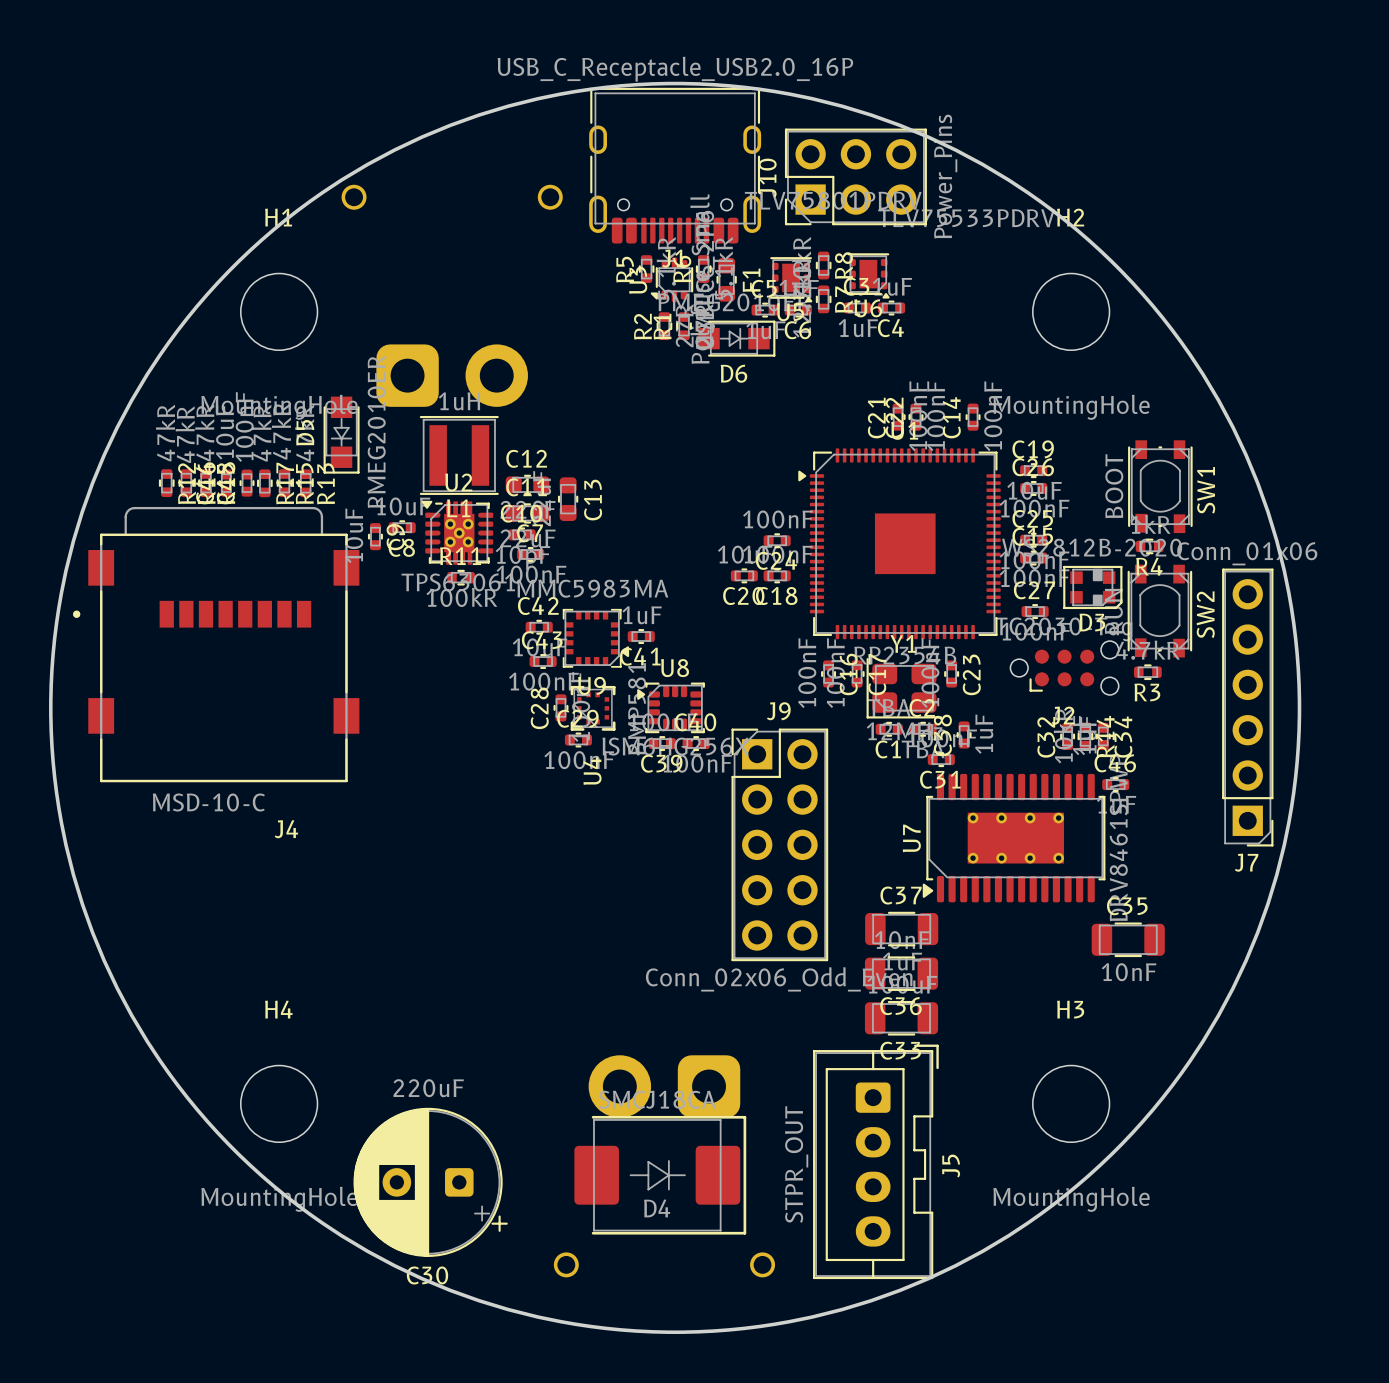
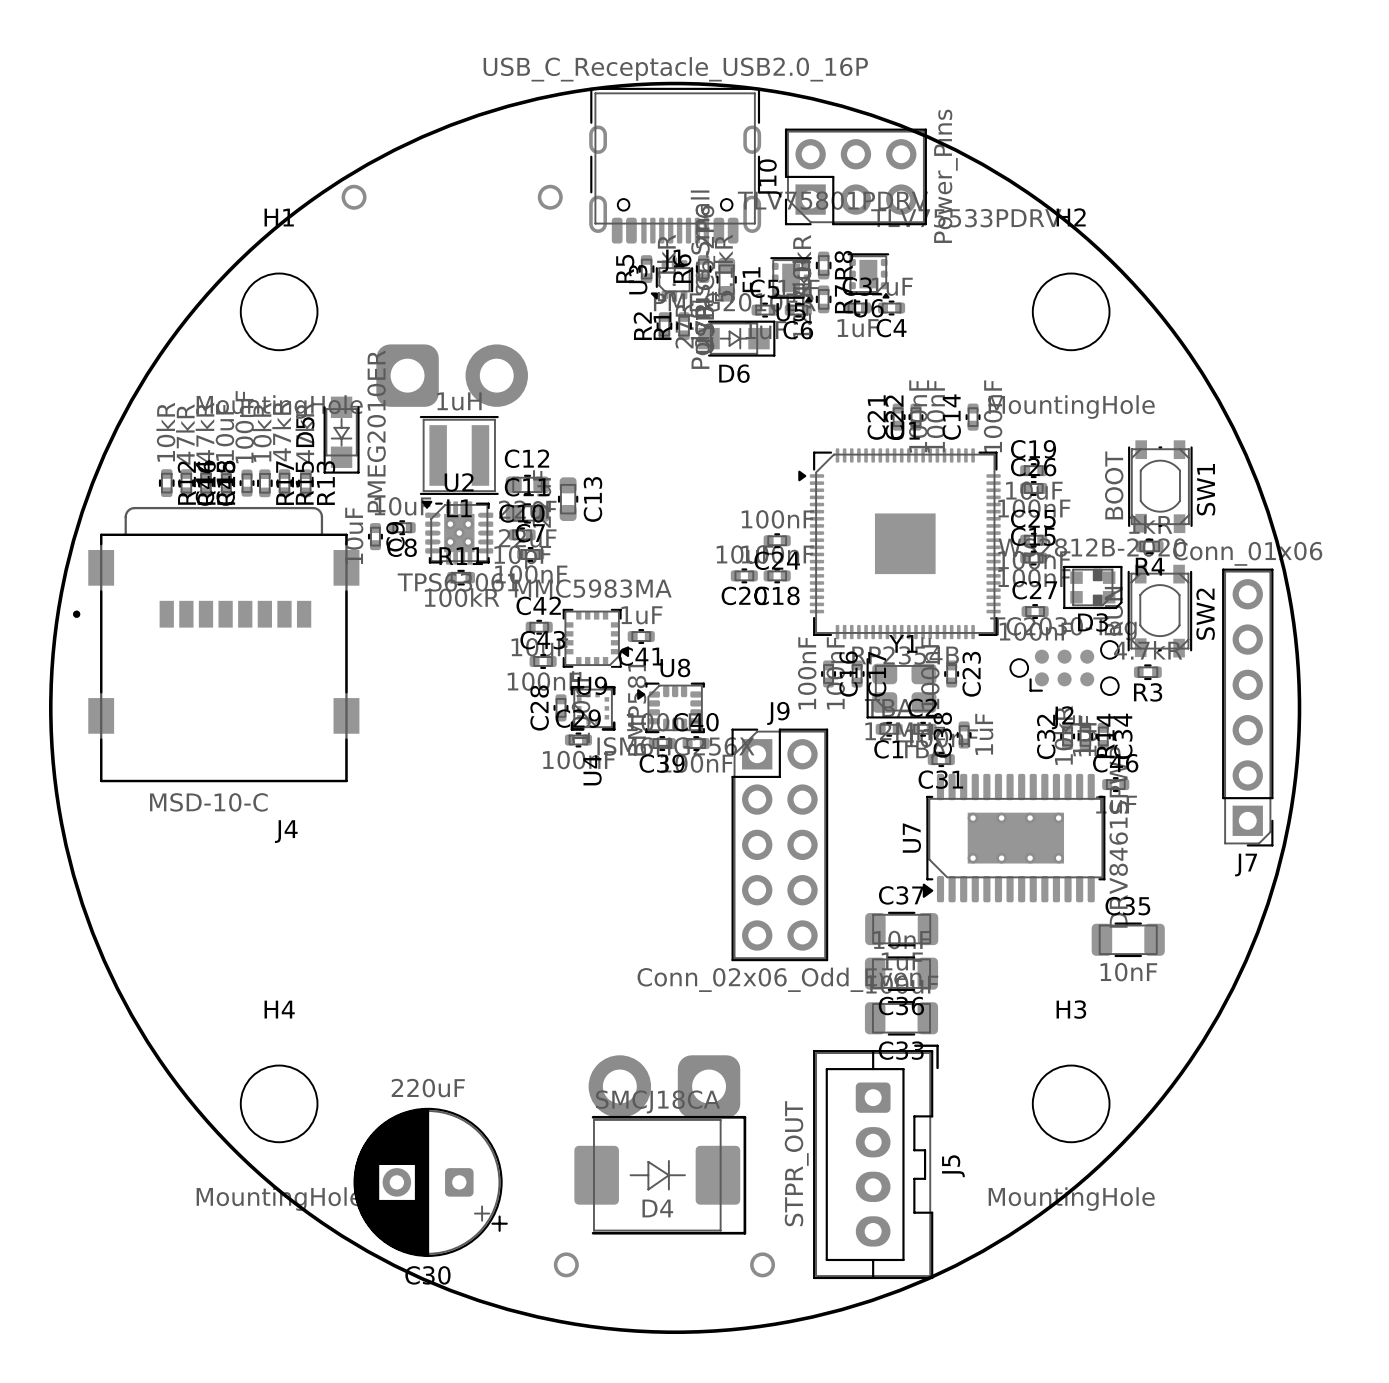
R12 value: 47kR (165, 432) -> 10kR (165, 432)
R17 value: 47kR (261, 433) -> 10kR (262, 432)

